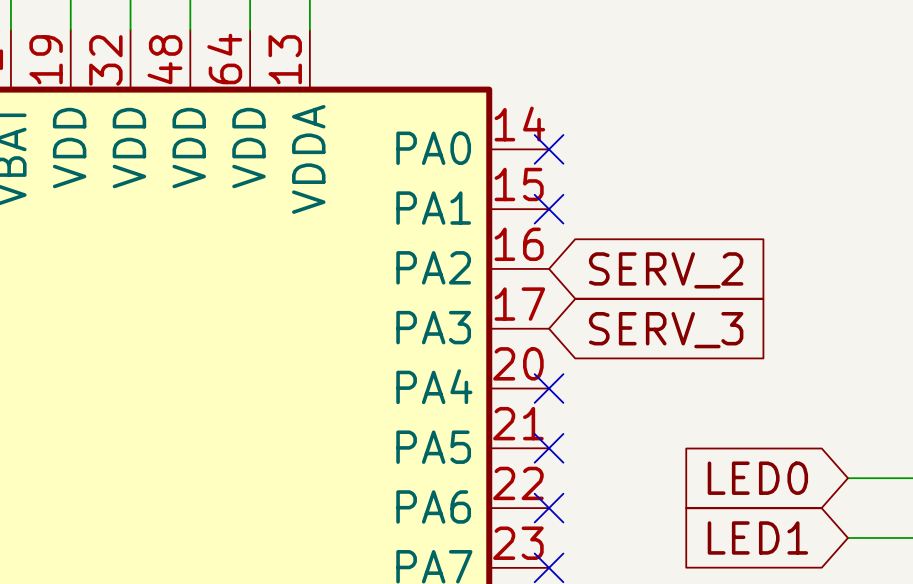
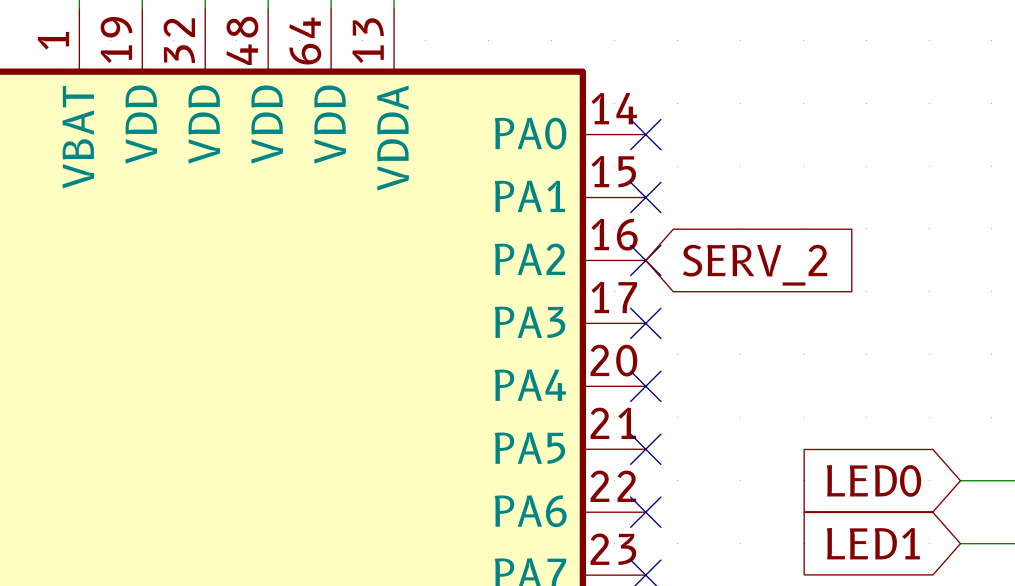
no-connect mark: none -> (645, 260)
no-connect mark: none -> (645, 323)
global label: SERV_3 (666, 330) -> none

